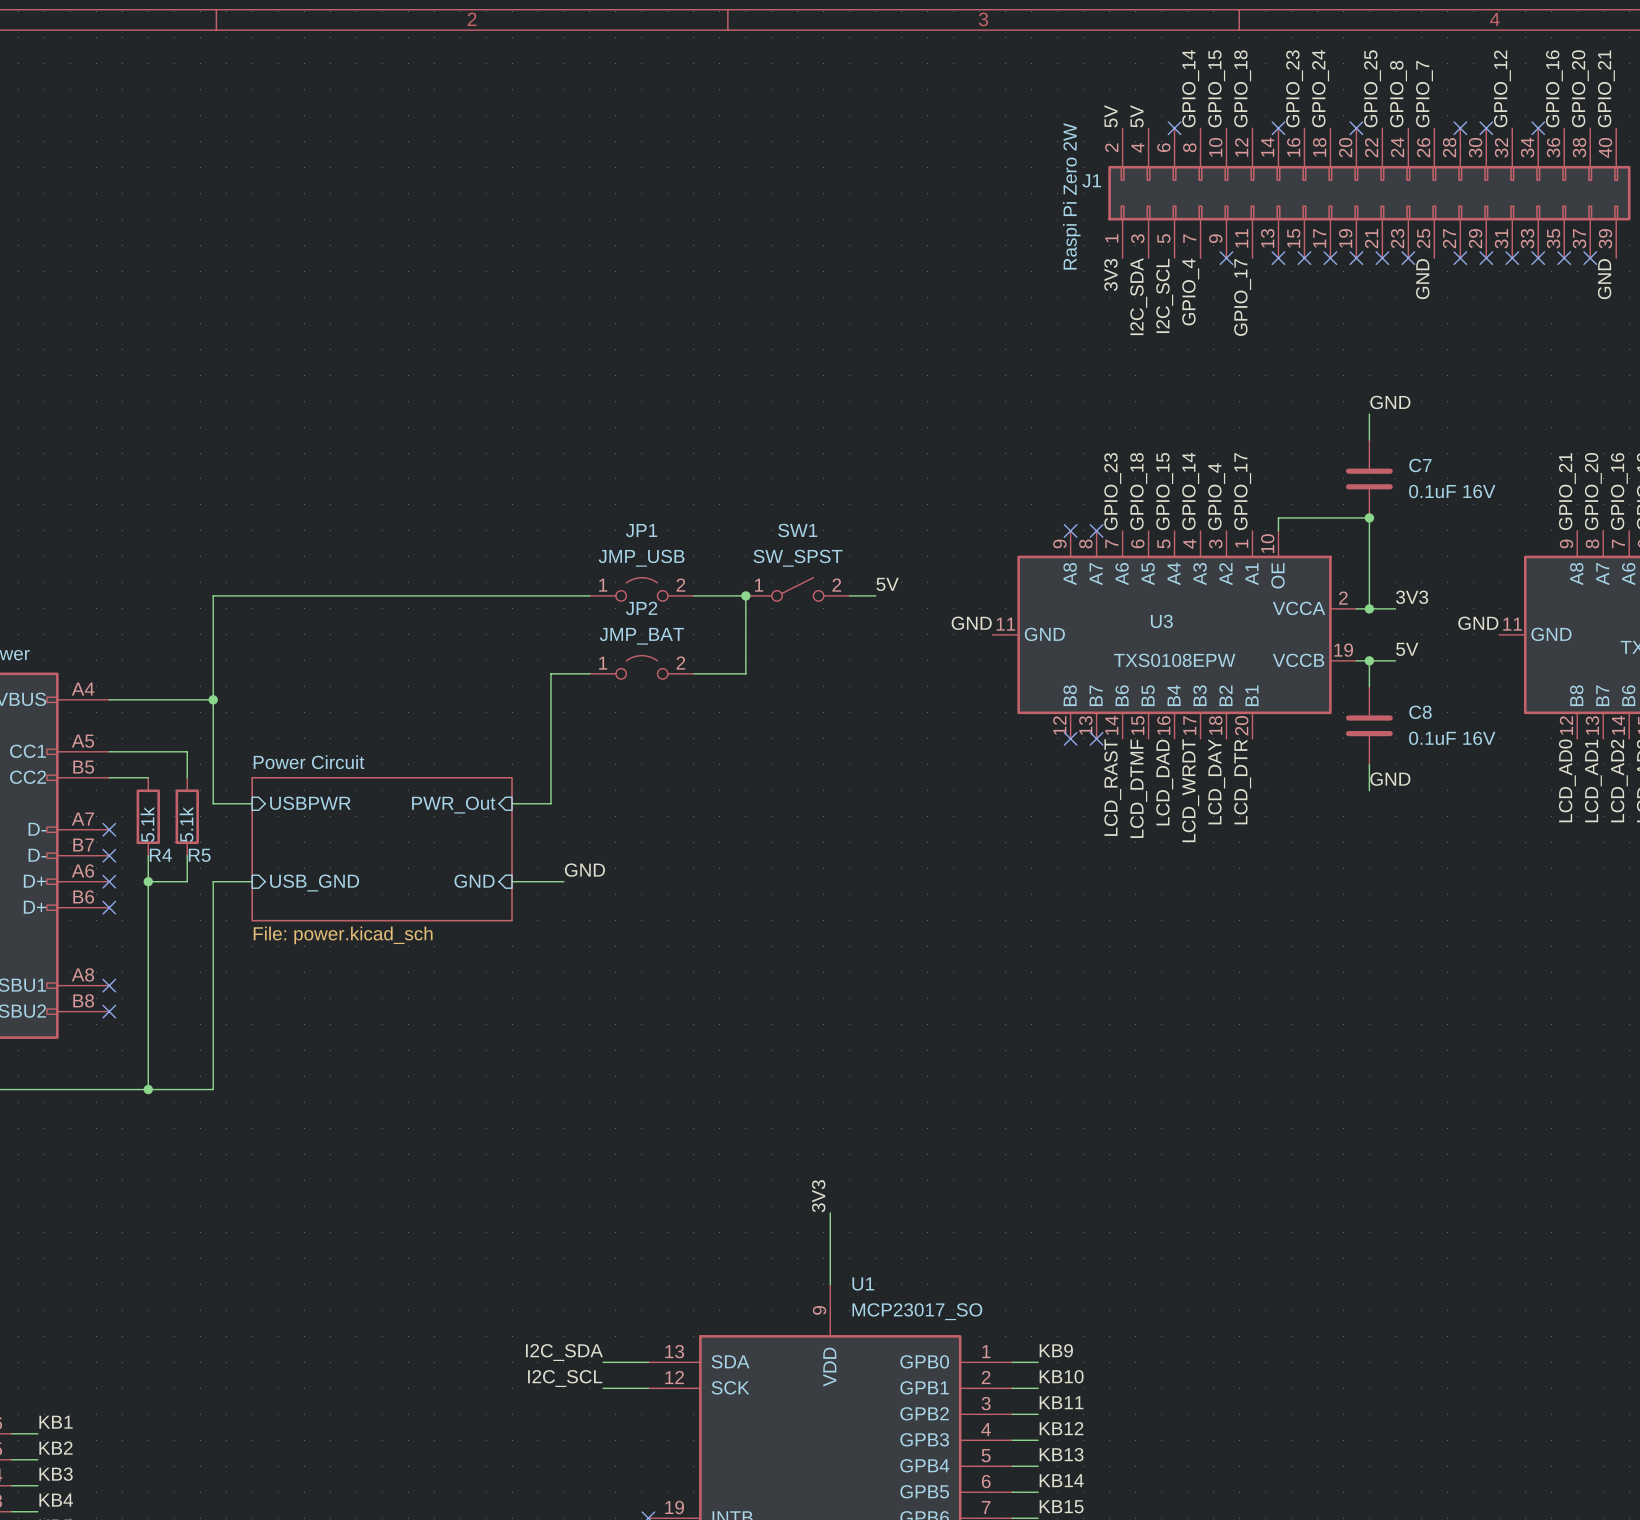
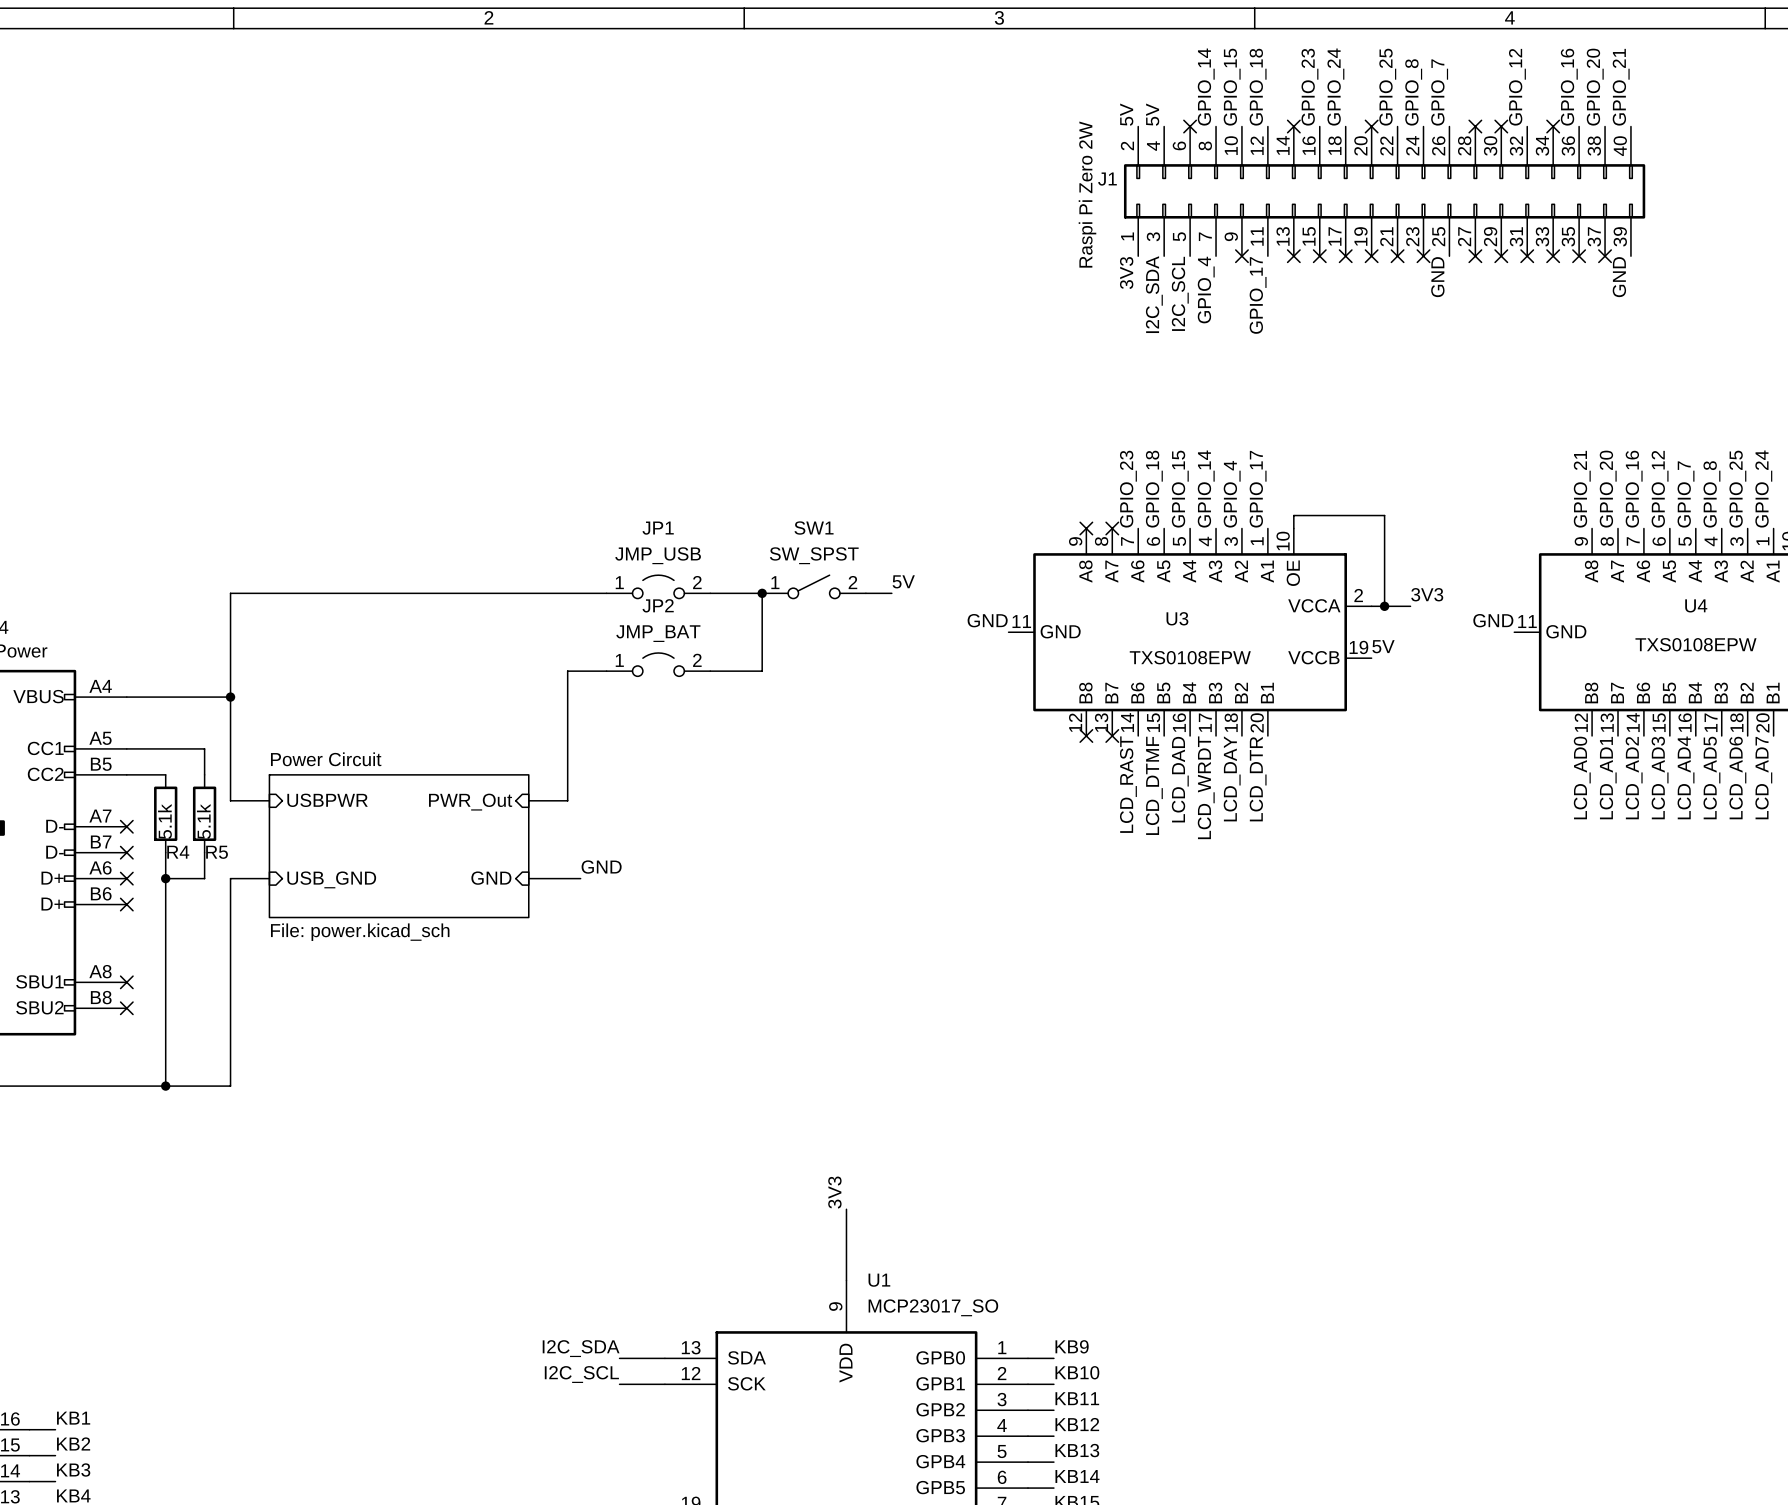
label: GND (1390, 402) -> none
wire: (1369, 414) (1369, 440) -> none
C7: 0.1uF 16V (1369, 478) -> none
junction: (1369, 517) -> none
label position: 5V (1407, 649) -> 5V (1383, 646)
wire: (1356, 660) (1395, 660) -> none
wire: (1369, 660) (1369, 686) -> none
junction: (1369, 660) -> none
C8: 0.1uF 16V (1369, 725) -> none
wire: (1369, 764) (1369, 790) -> none
label: GND (1390, 779) -> none

